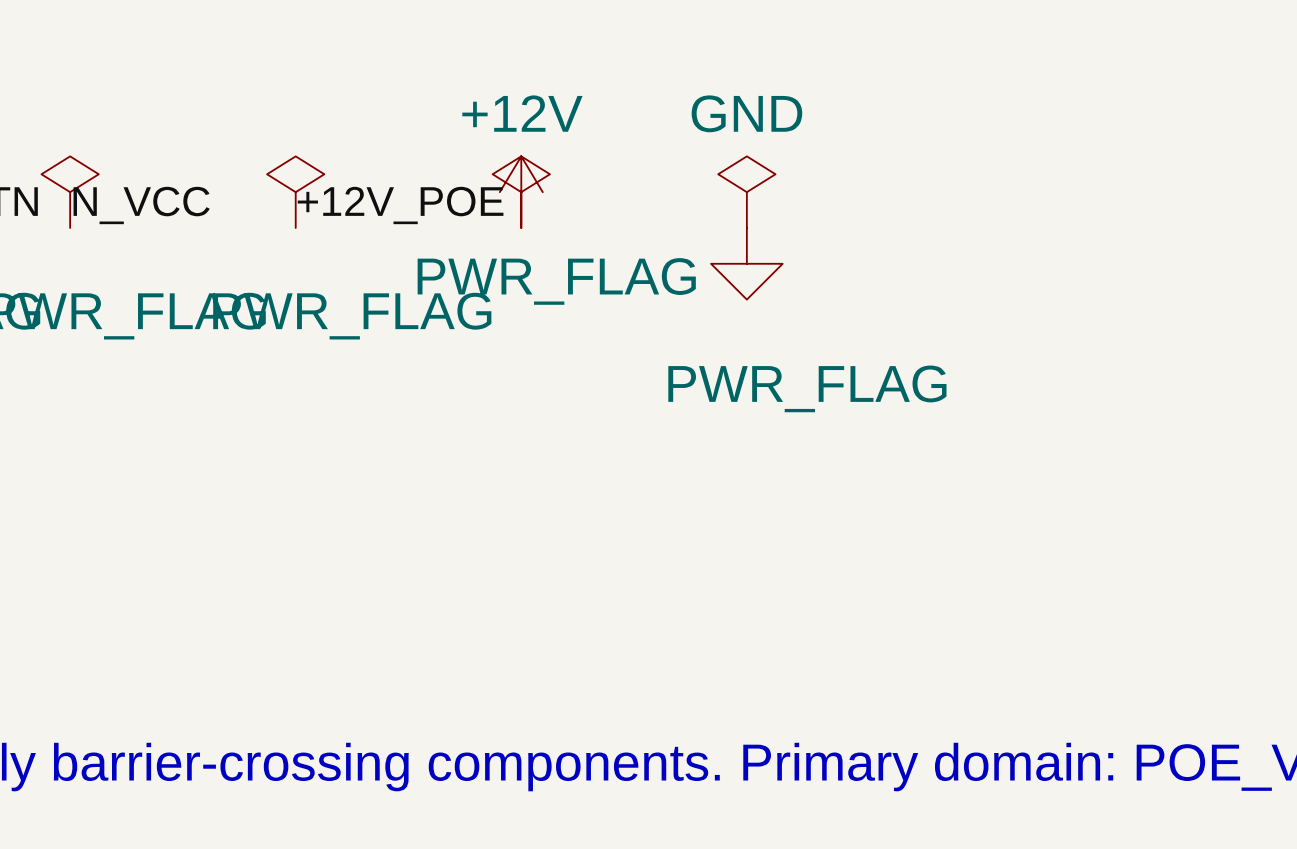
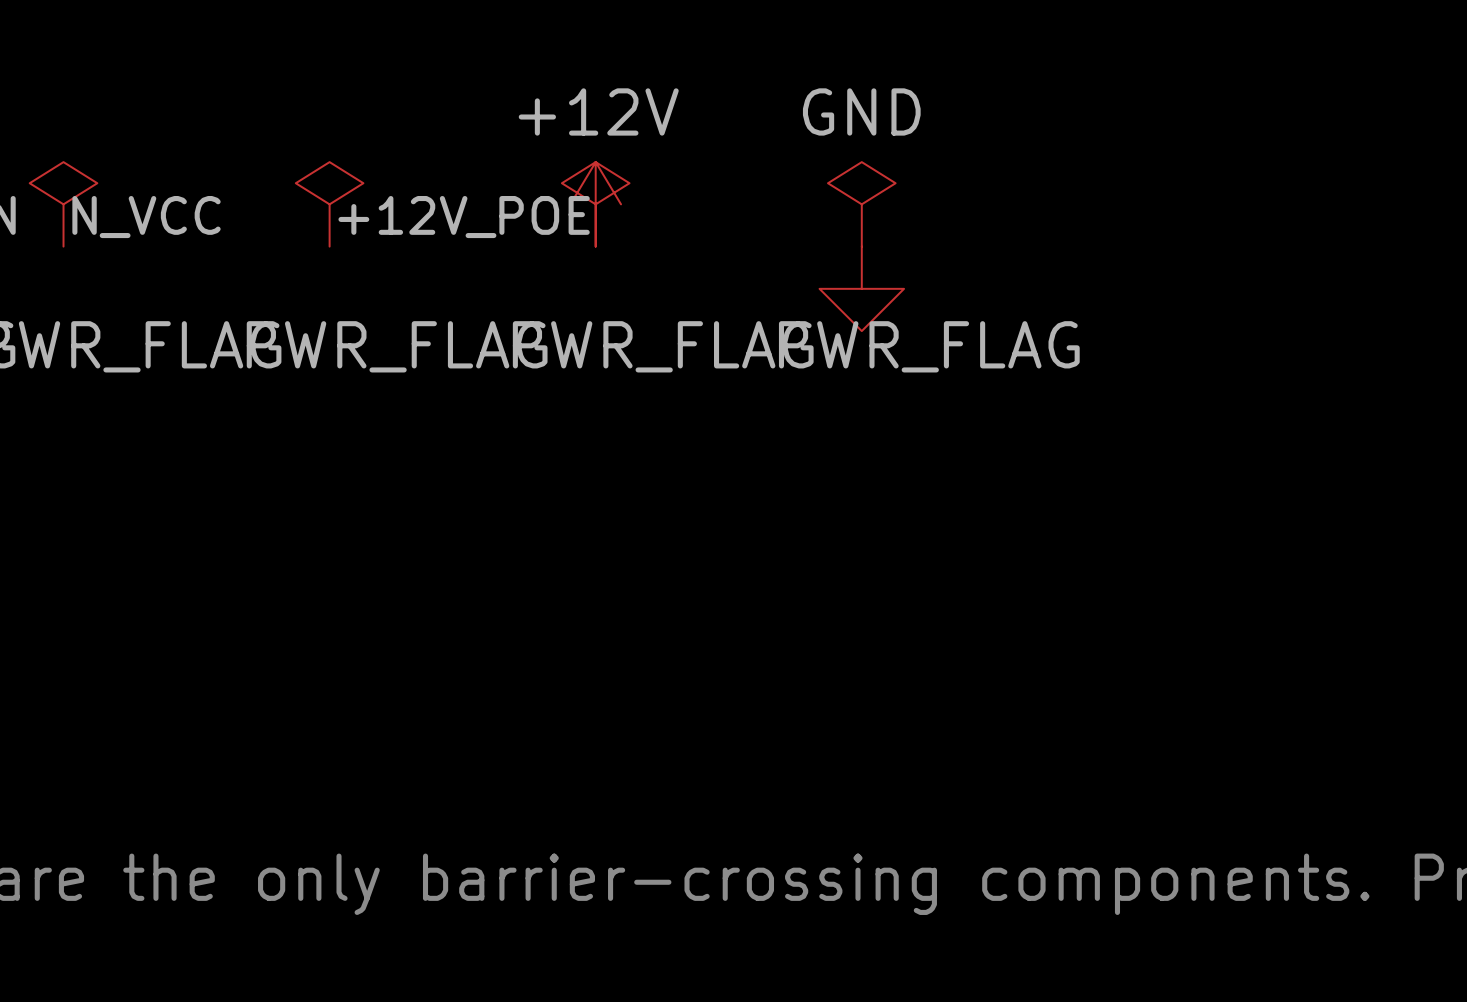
power symbol text position: PWR_FLAG (556, 281) -> PWR_FLAG (663, 346)
power symbol text position: PWR_FLAG (807, 388) -> PWR_FLAG (929, 346)

